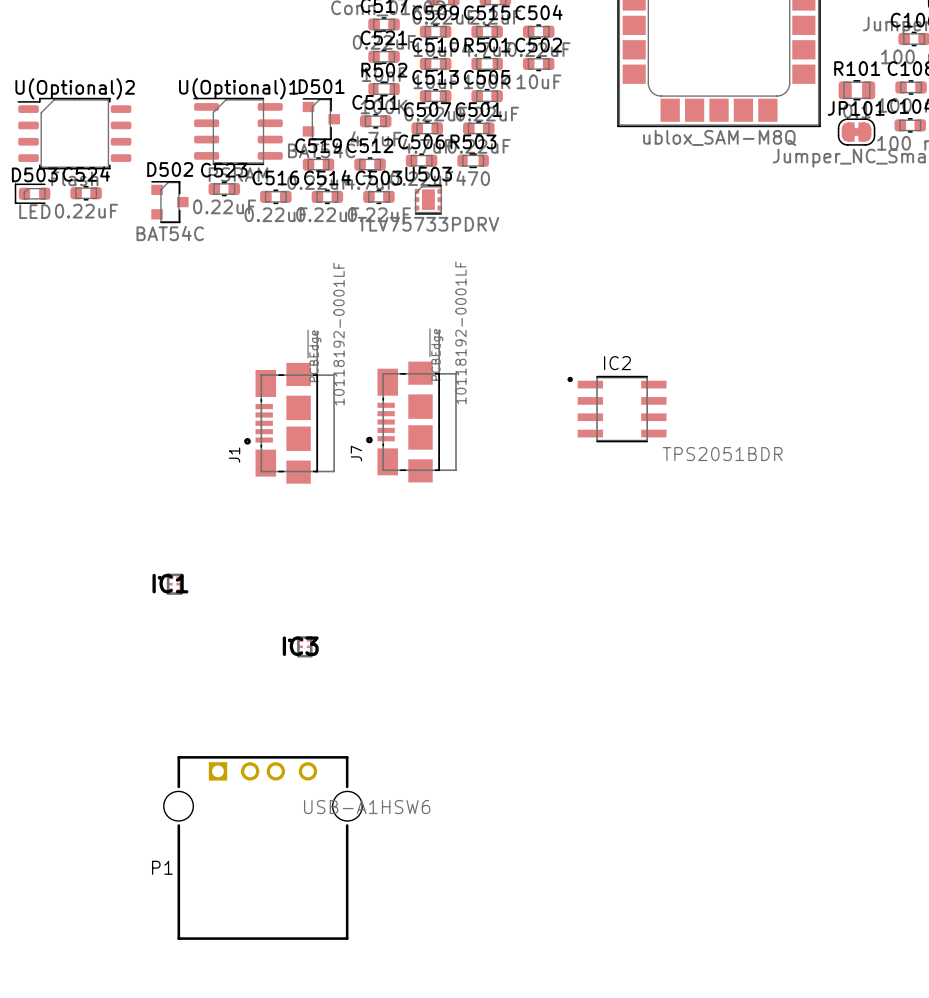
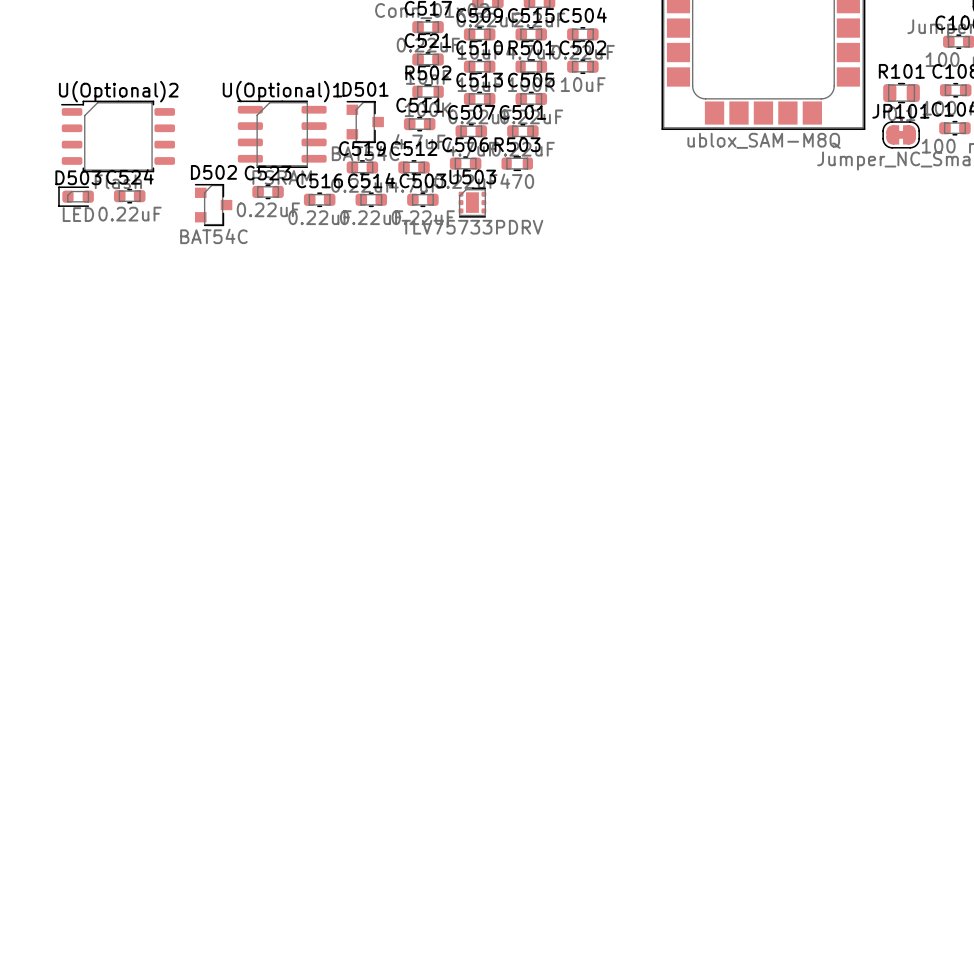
J7: 10118192-0001LF (411, 405) -> none
J1: 10118192-0001LF (289, 407) -> none
IC2: TPS2051BDR (617, 409) -> none
IC1: (170, 584) -> none
IC3: (300, 646) -> none
P1: USB-A1HSW6 (262, 847) -> none

